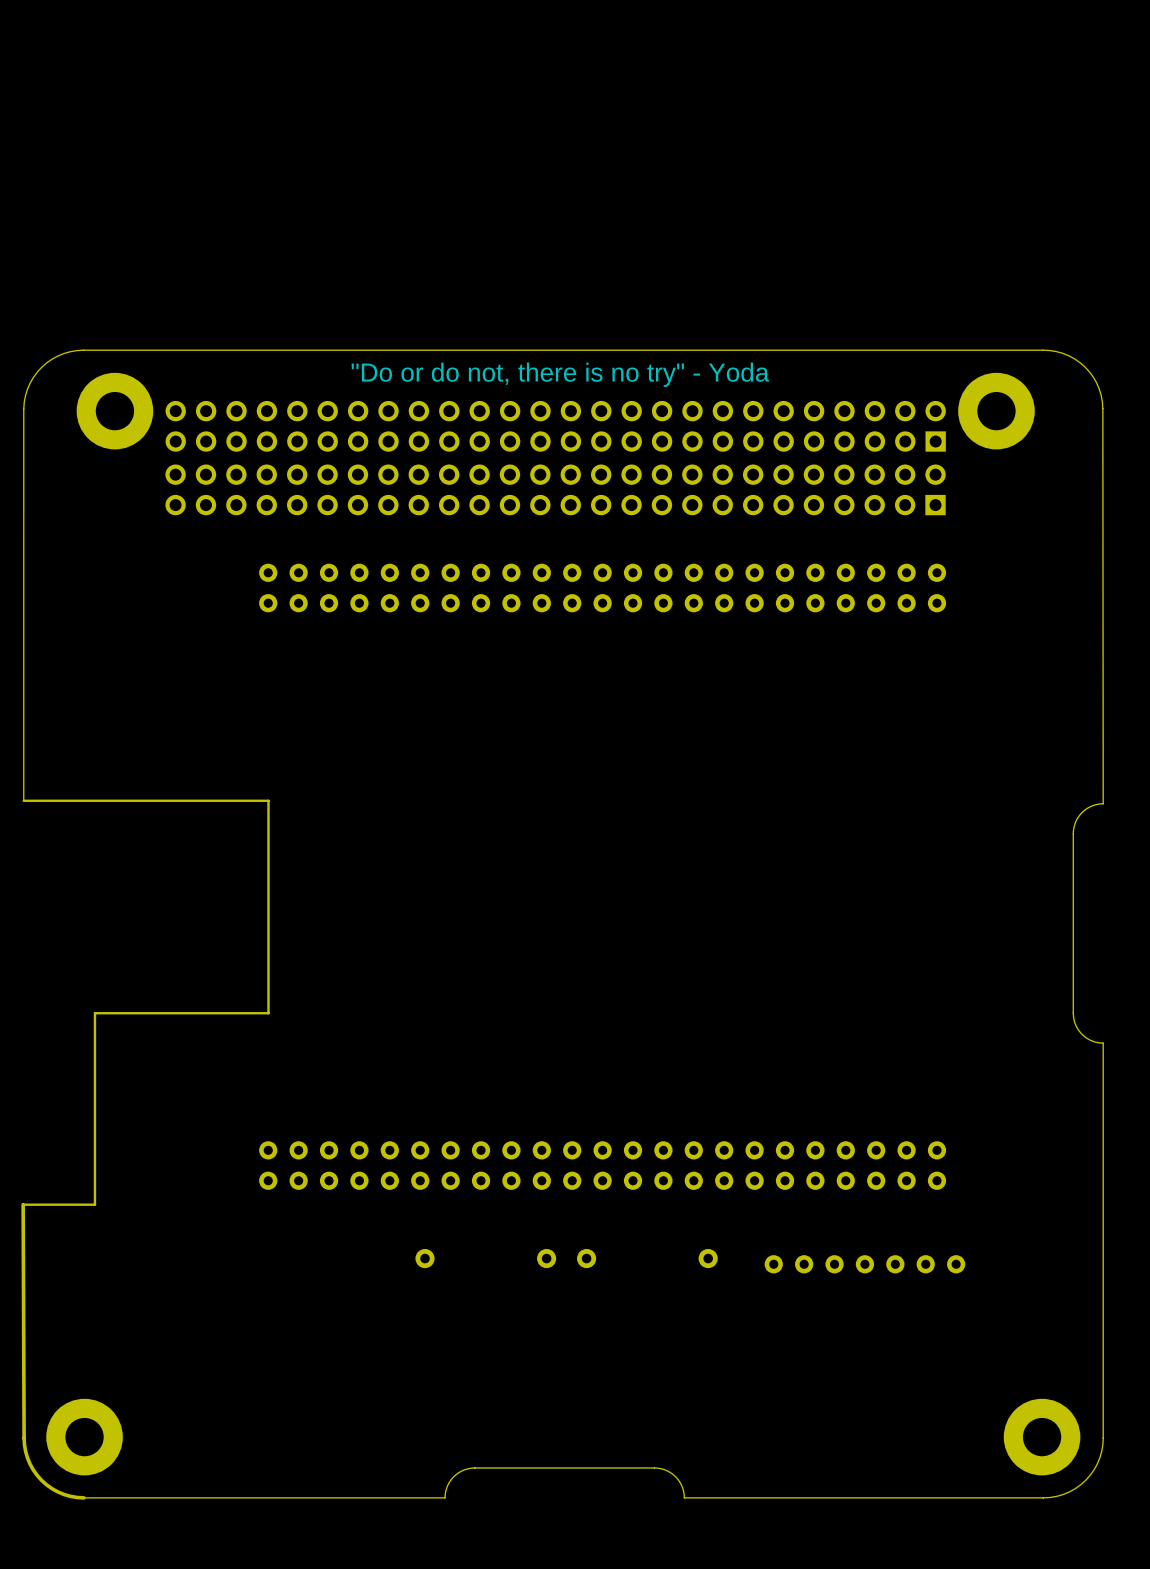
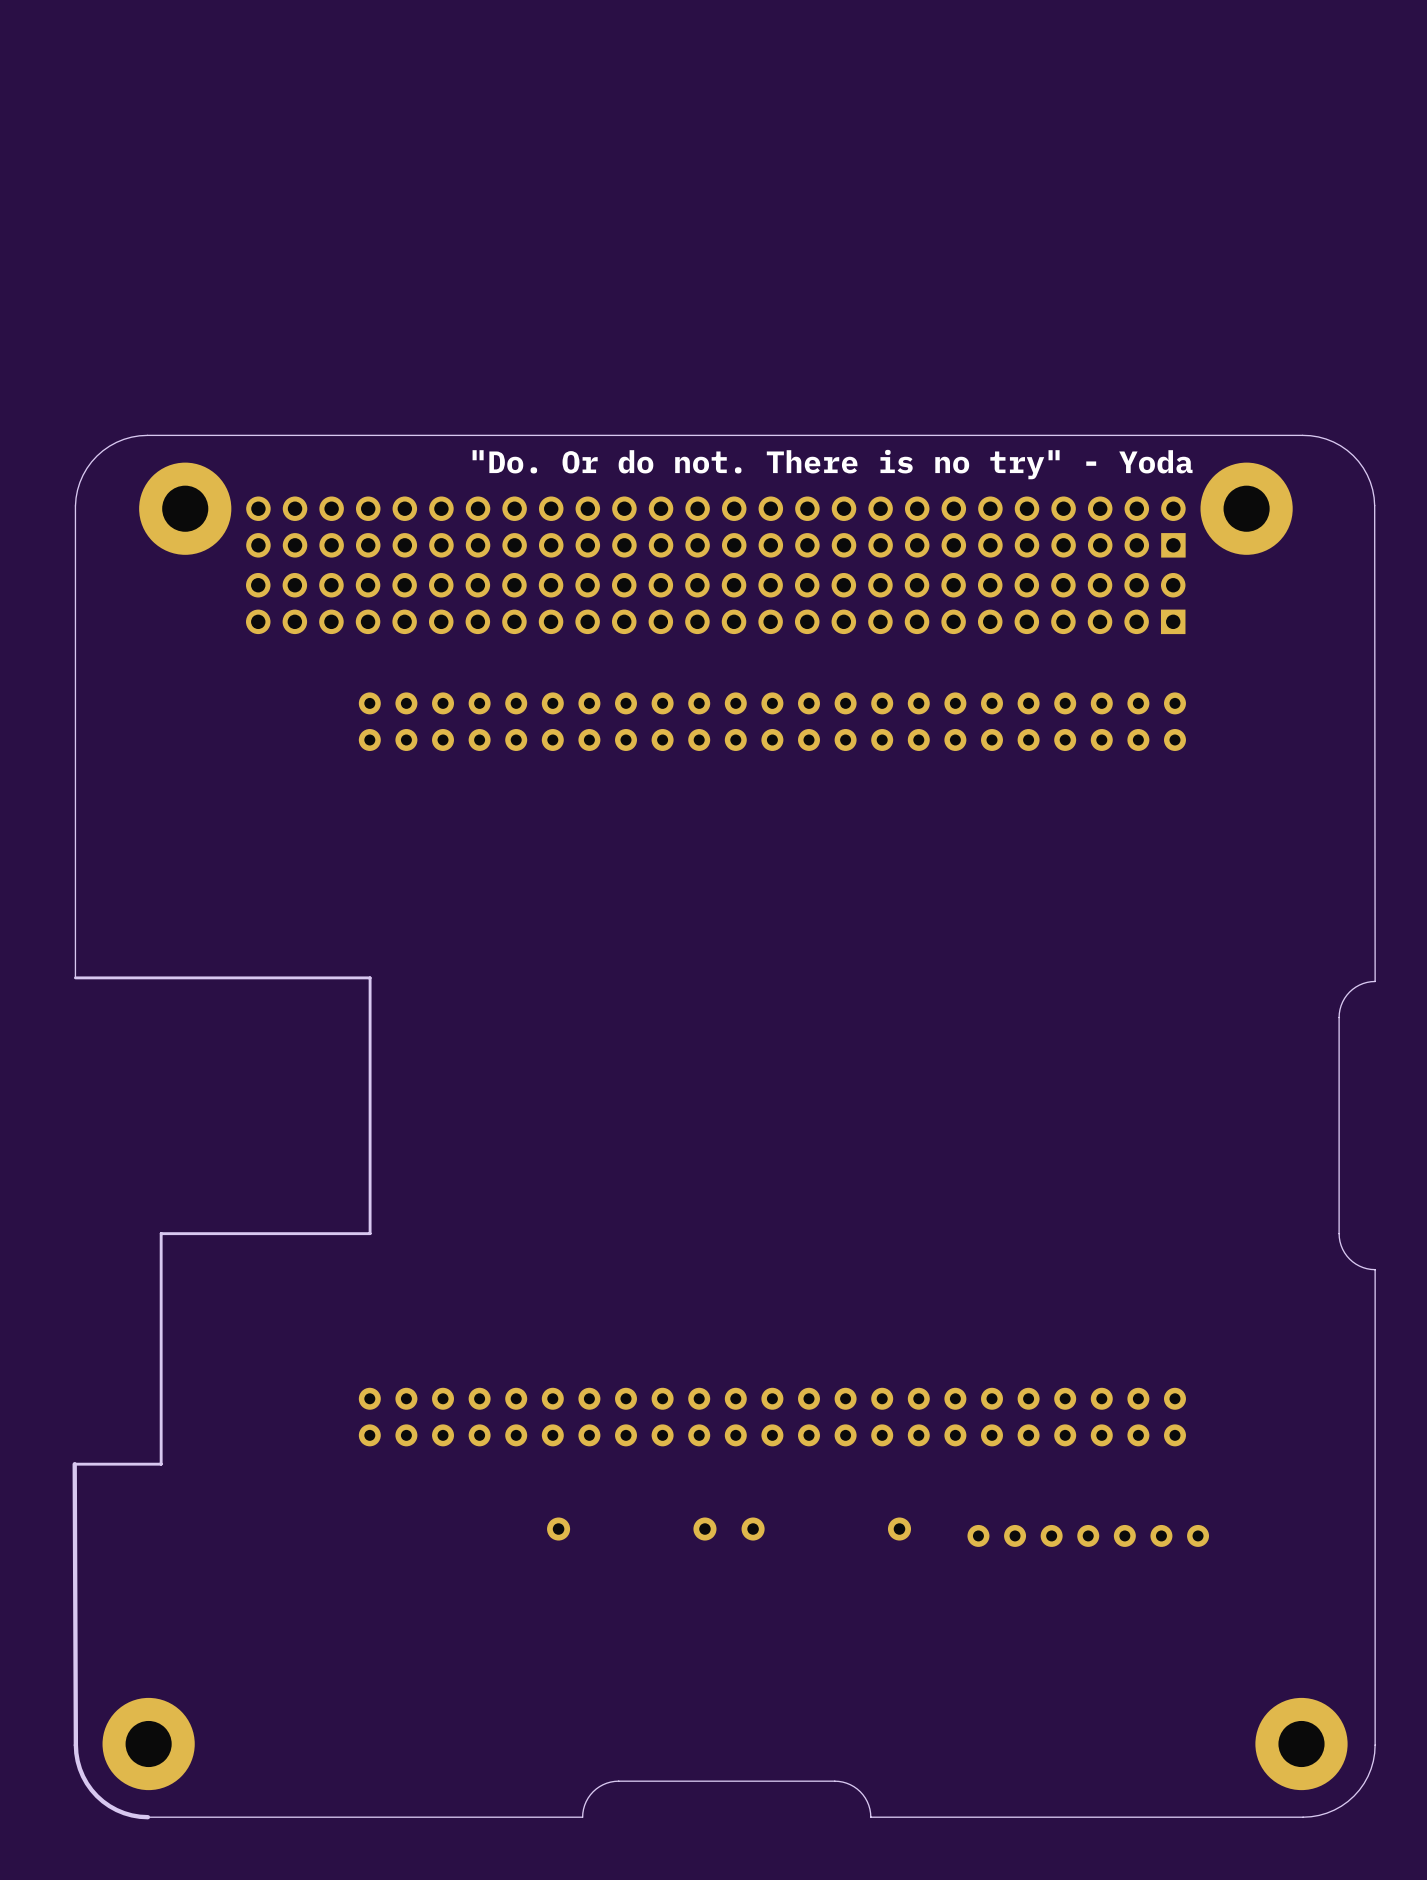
text: "Do or do not, there is no try" - Yoda (560, 374) -> "Do. Or do not. There is no try" - Yoda (832, 464)

